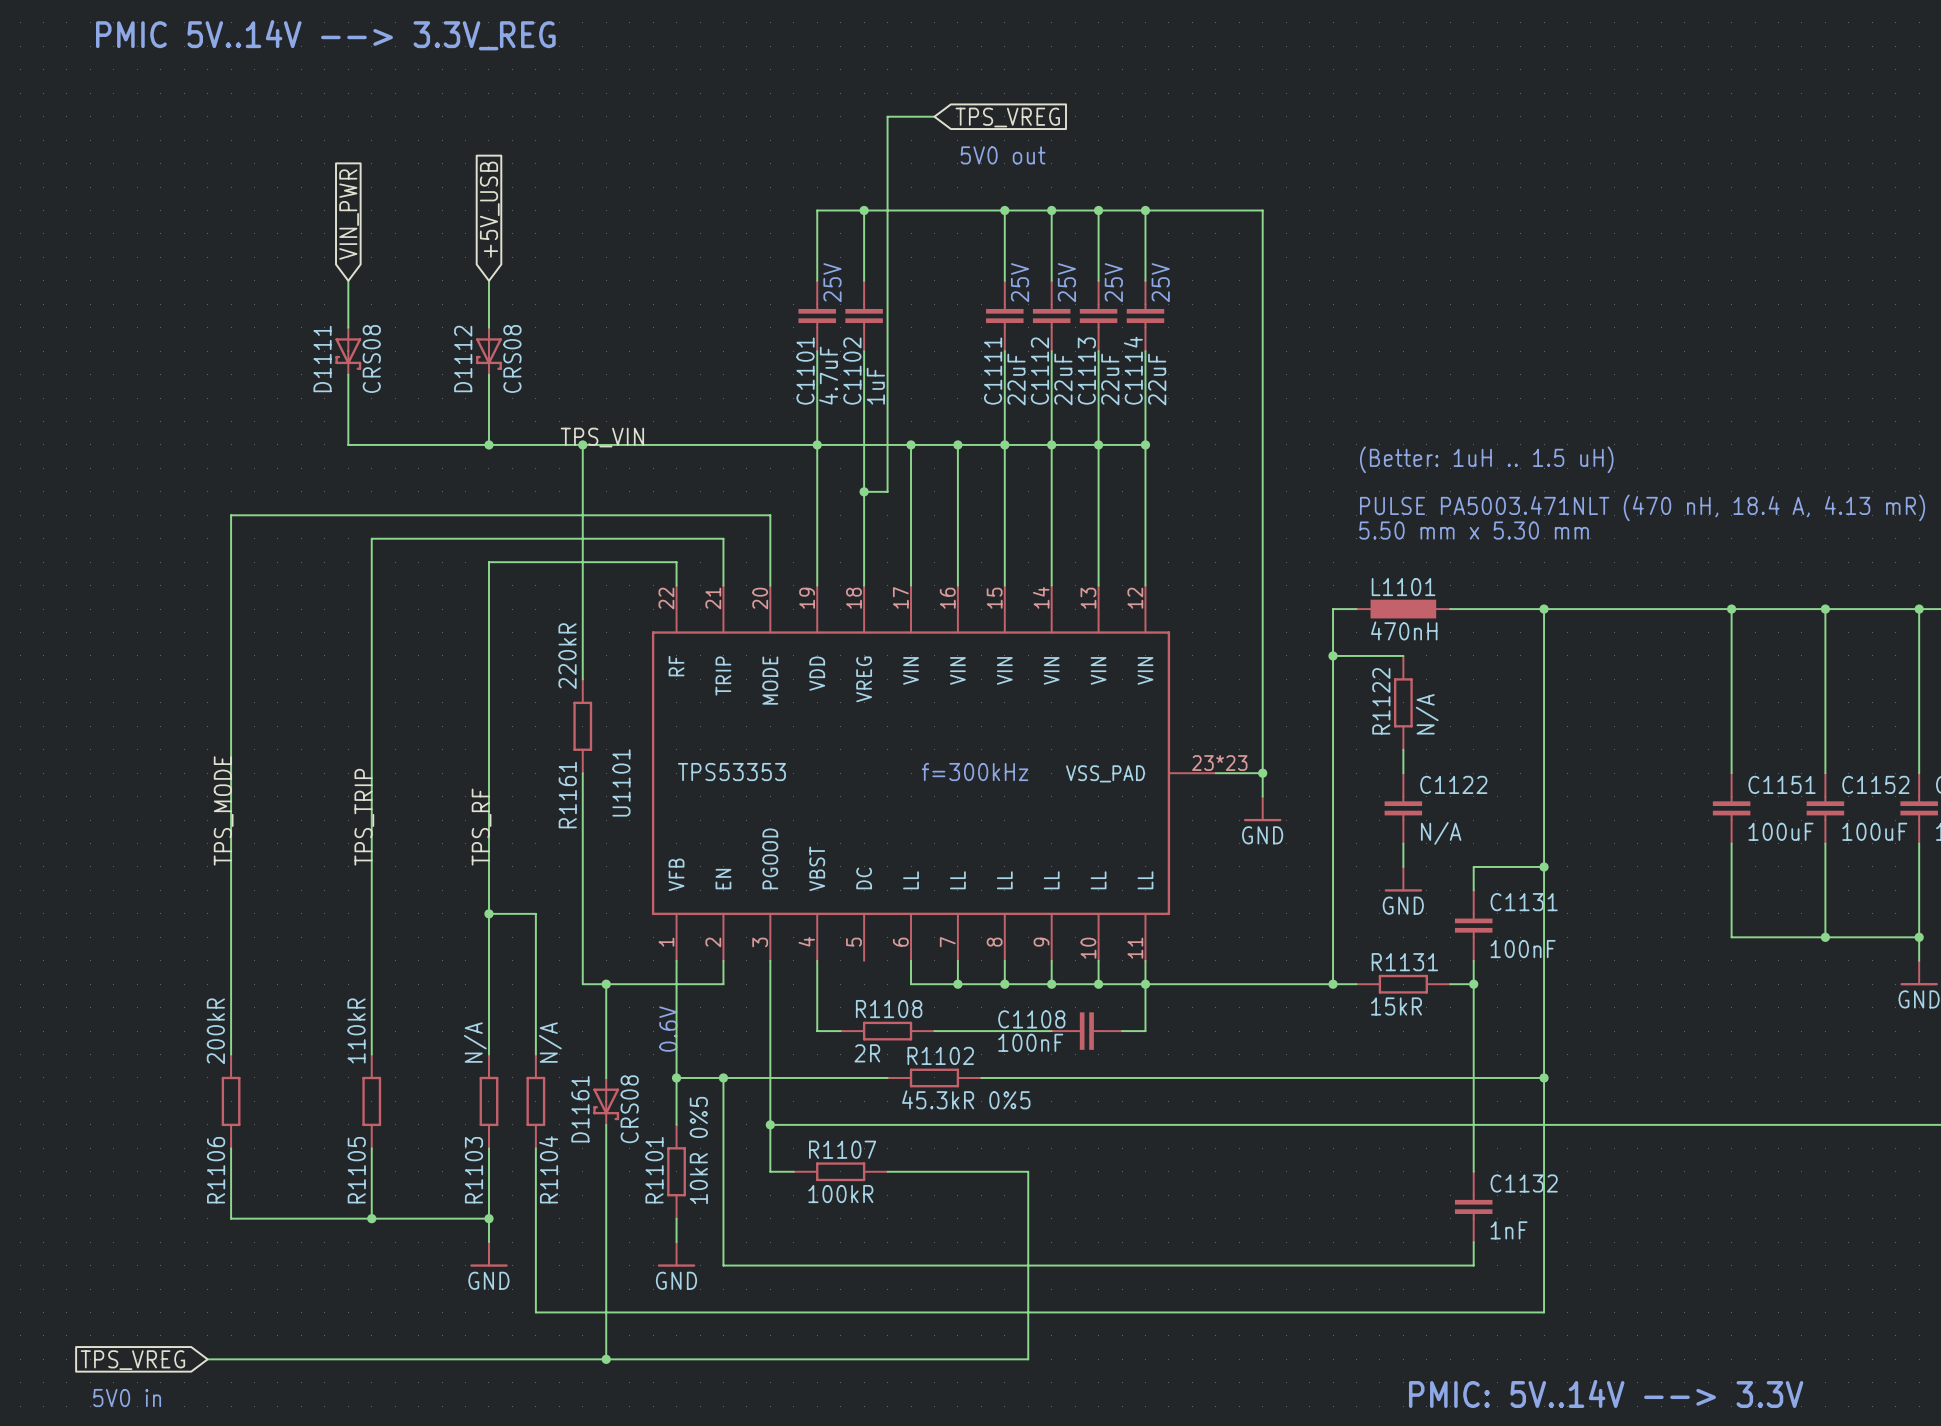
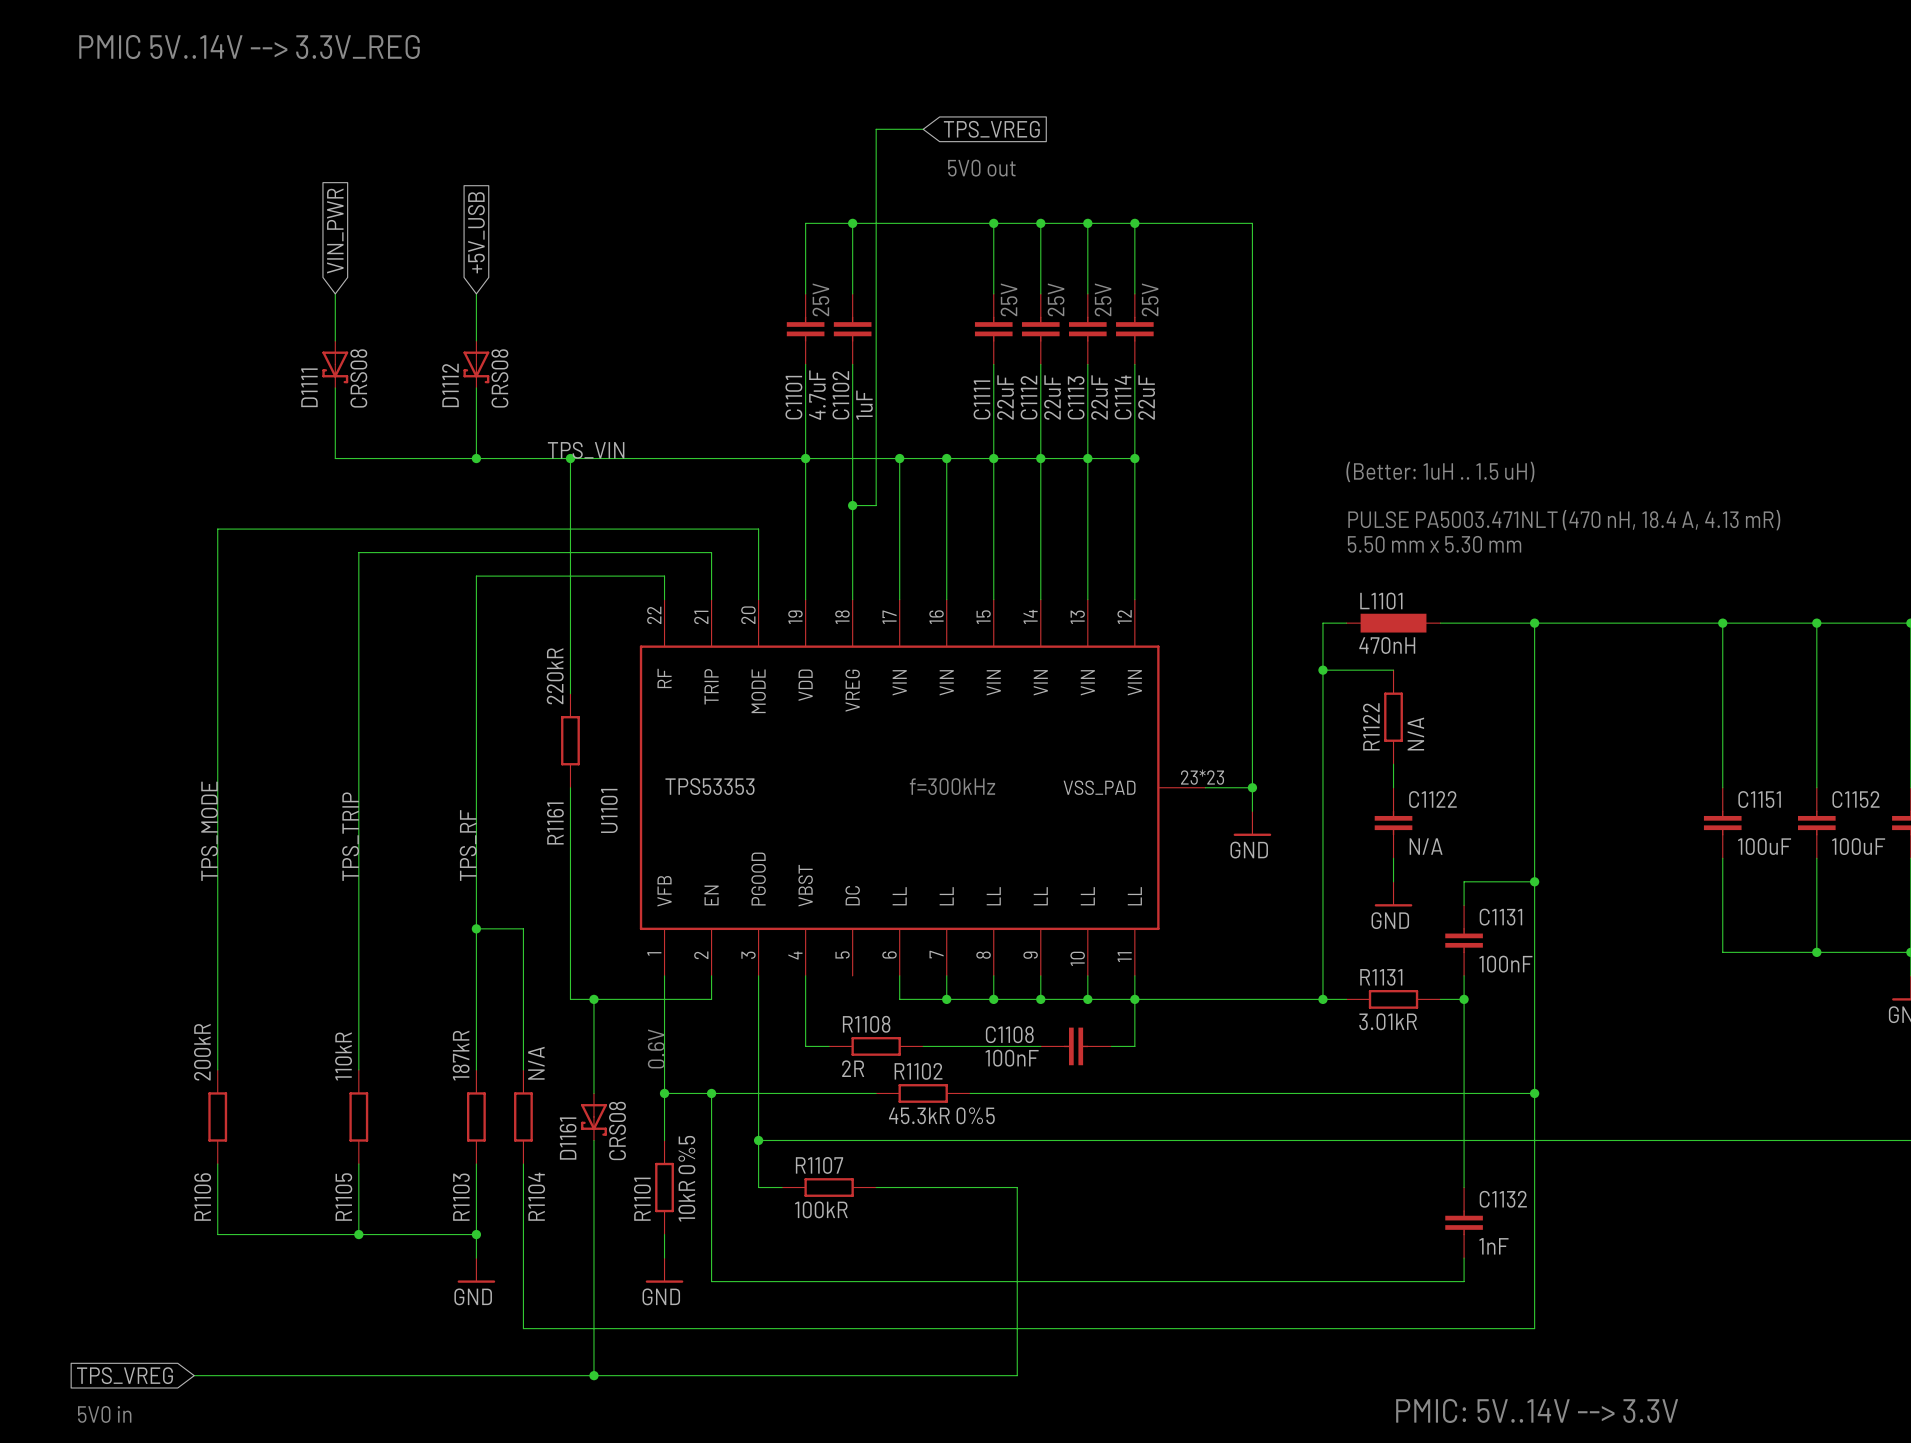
R1131 value: 15kR (1396, 1006) -> 3.01kR (1388, 1021)
R1103 value: N/A (475, 1042) -> 187kR (461, 1055)

